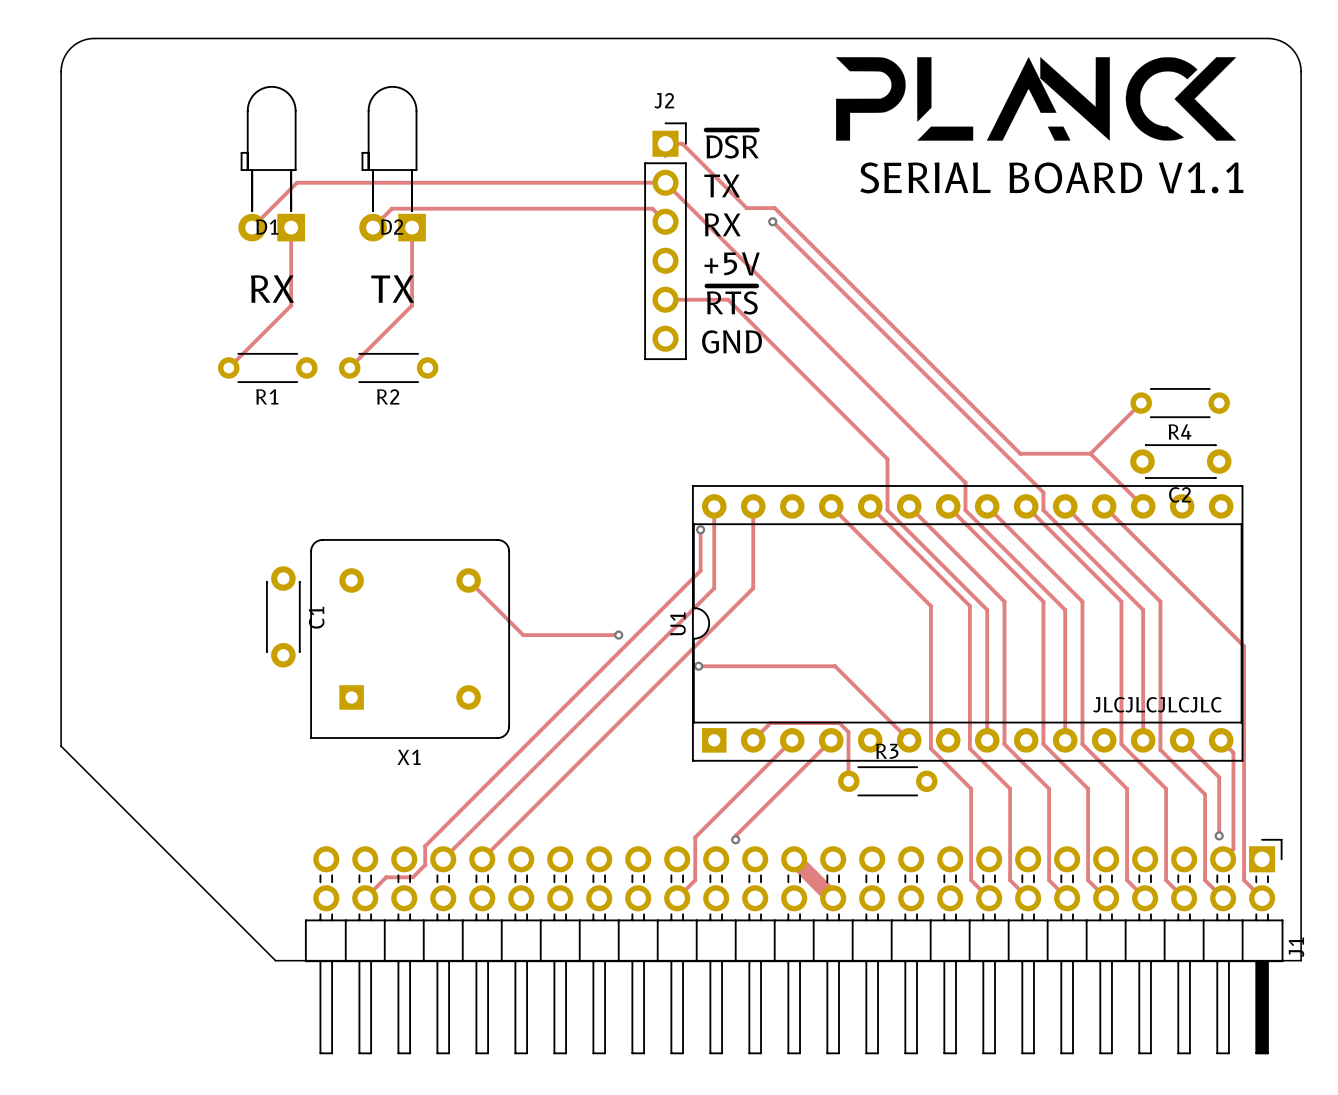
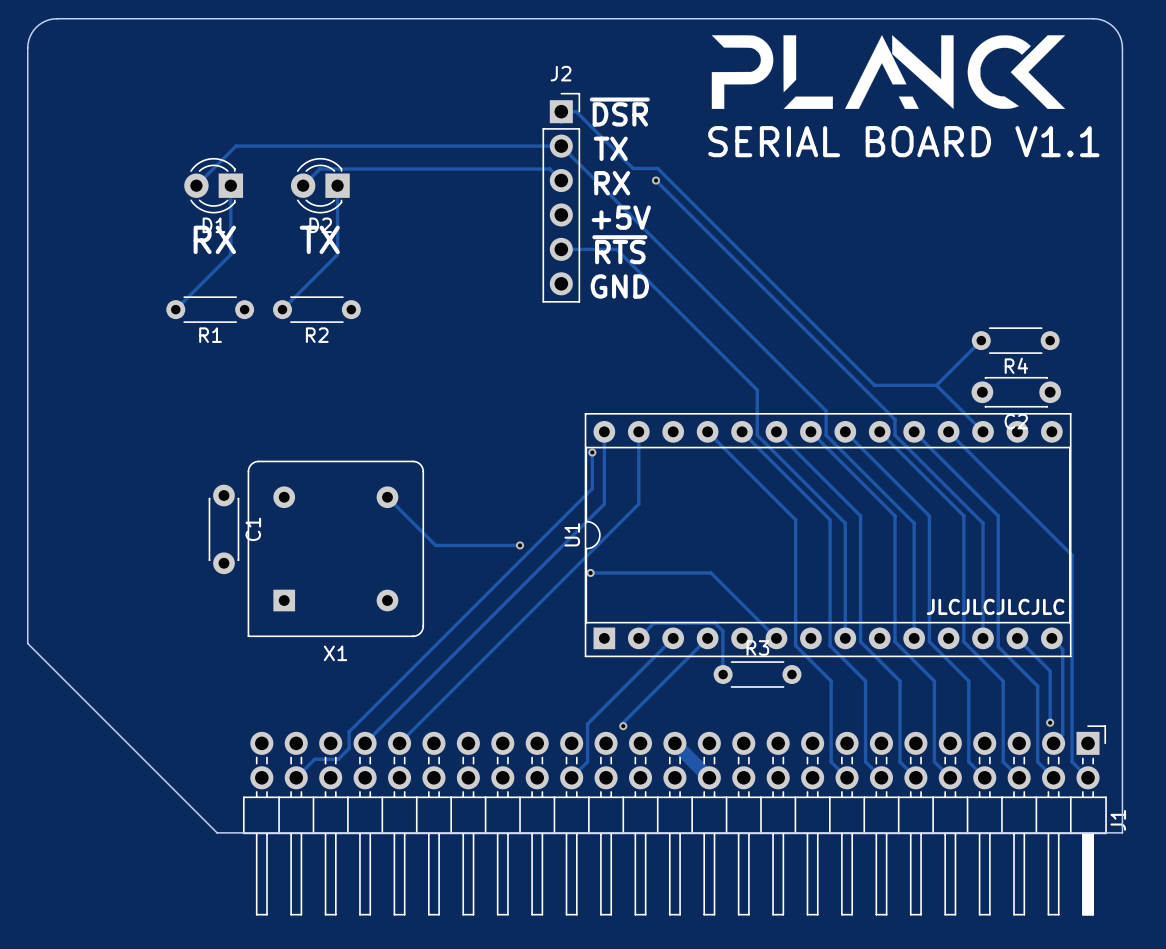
D1 footprint: [238, 85, 305, 242] -> [184, 157, 244, 214]
D2 footprint: [359, 85, 426, 242] -> [290, 157, 350, 214]

